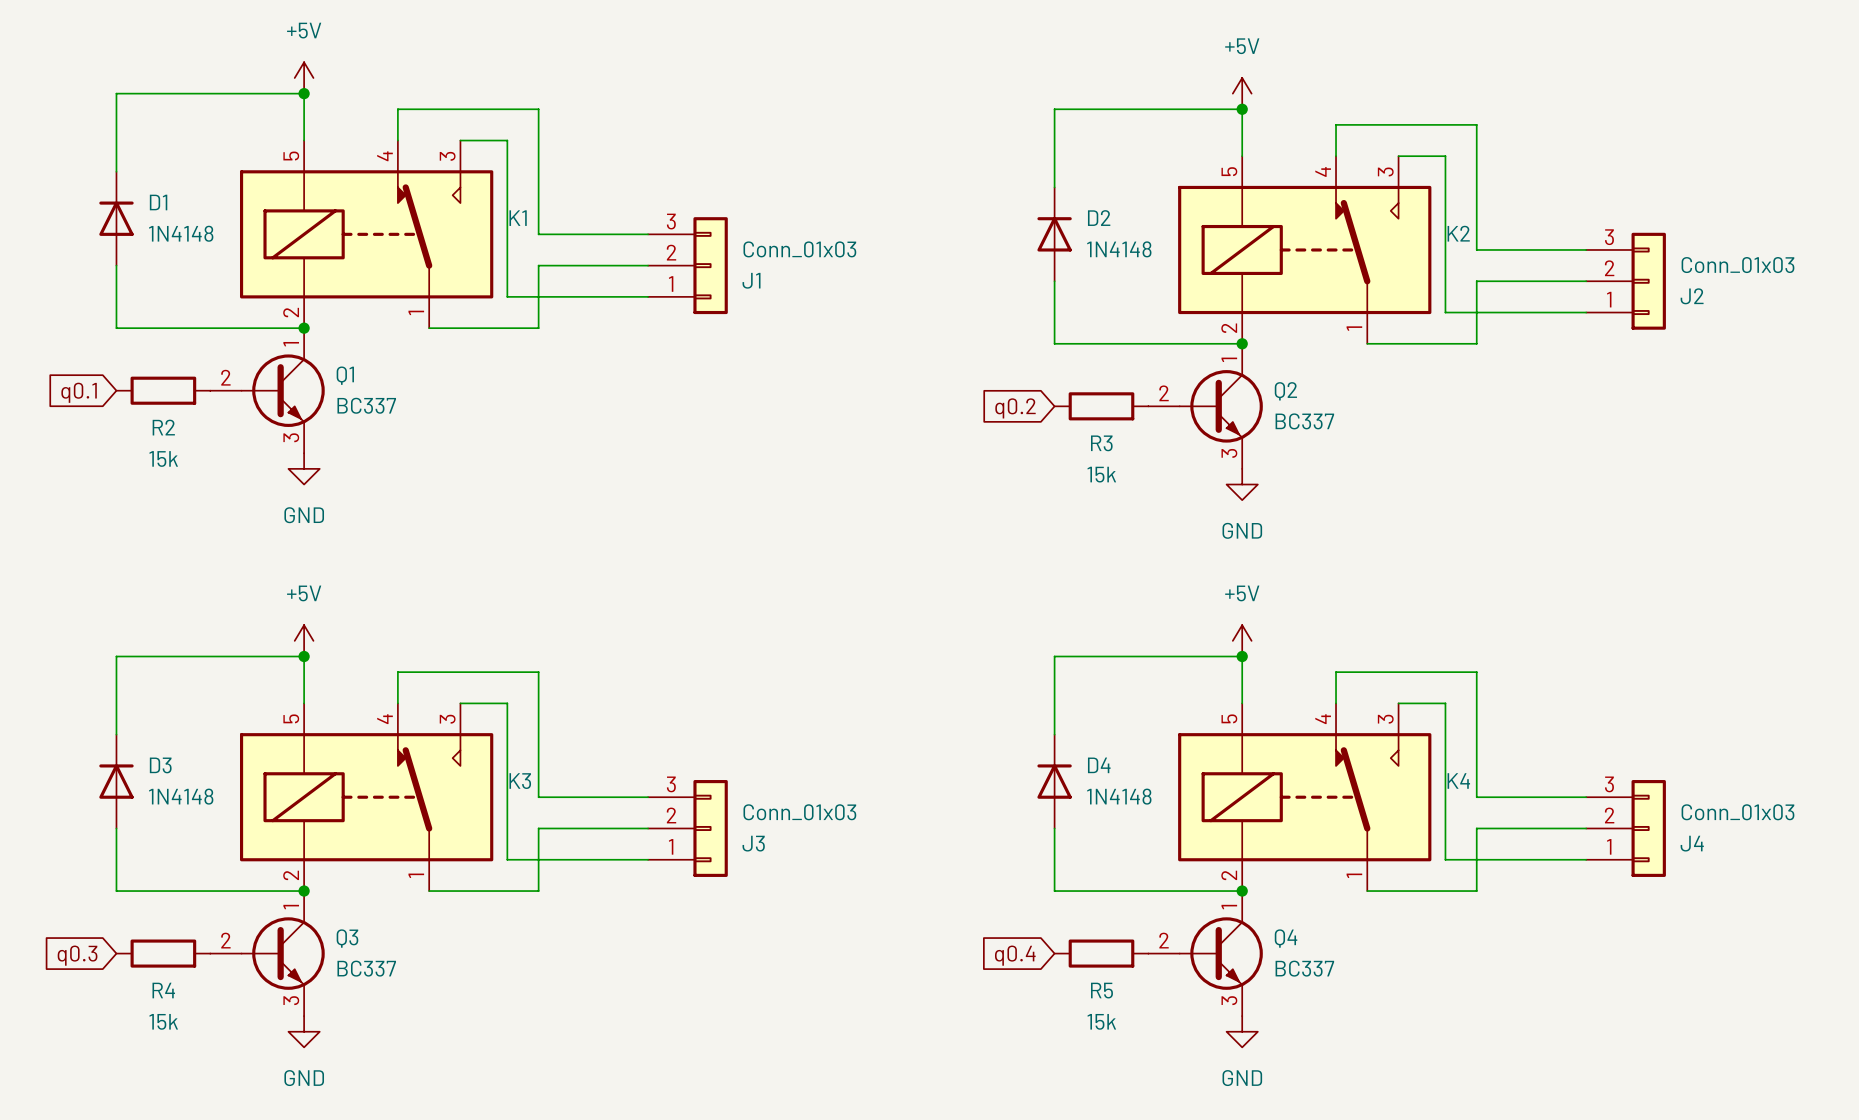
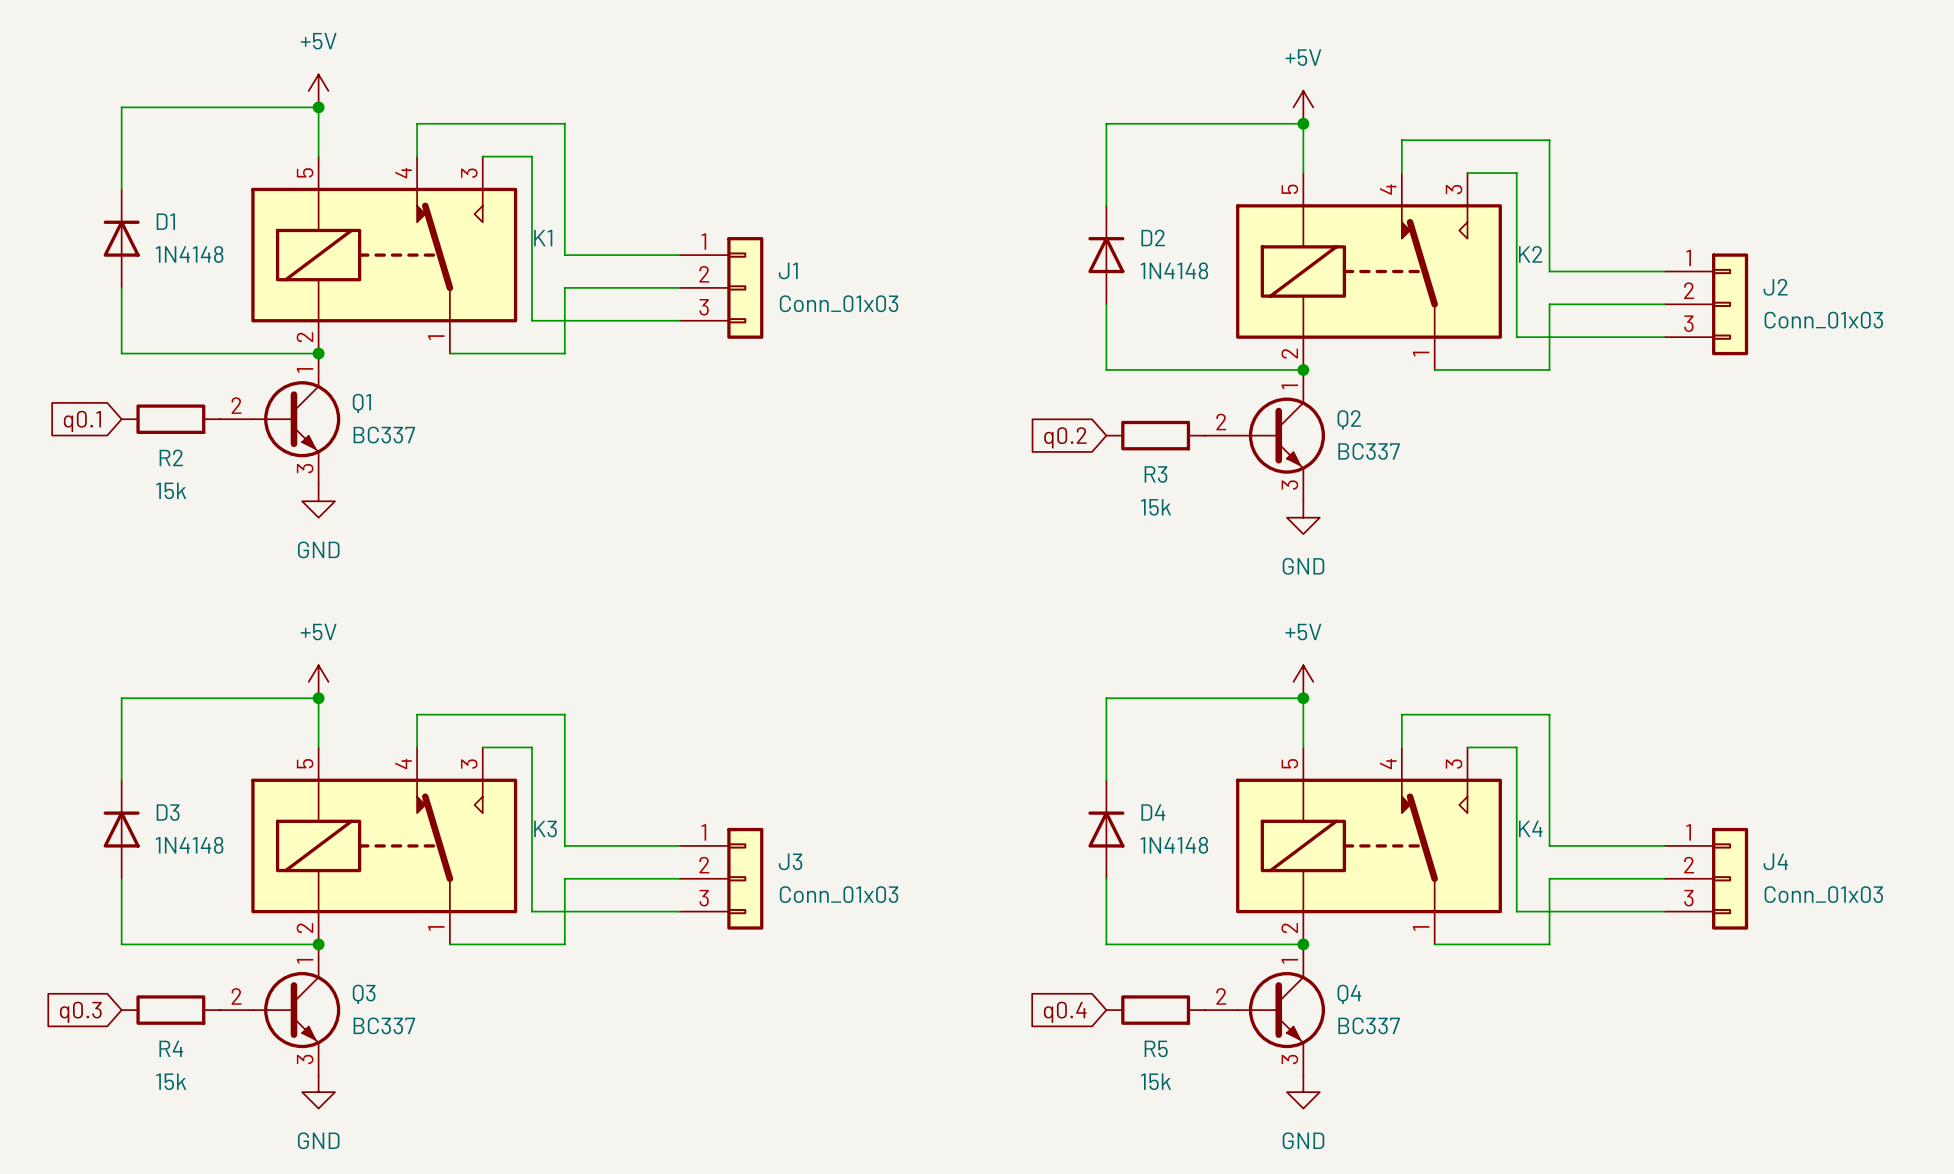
J1 flip: as is (710, 265) -> up-down (745, 287)
J2 flip: as is (1648, 281) -> up-down (1730, 304)
J3 flip: as is (710, 828) -> up-down (745, 878)
J4 flip: as is (1648, 828) -> up-down (1730, 878)

